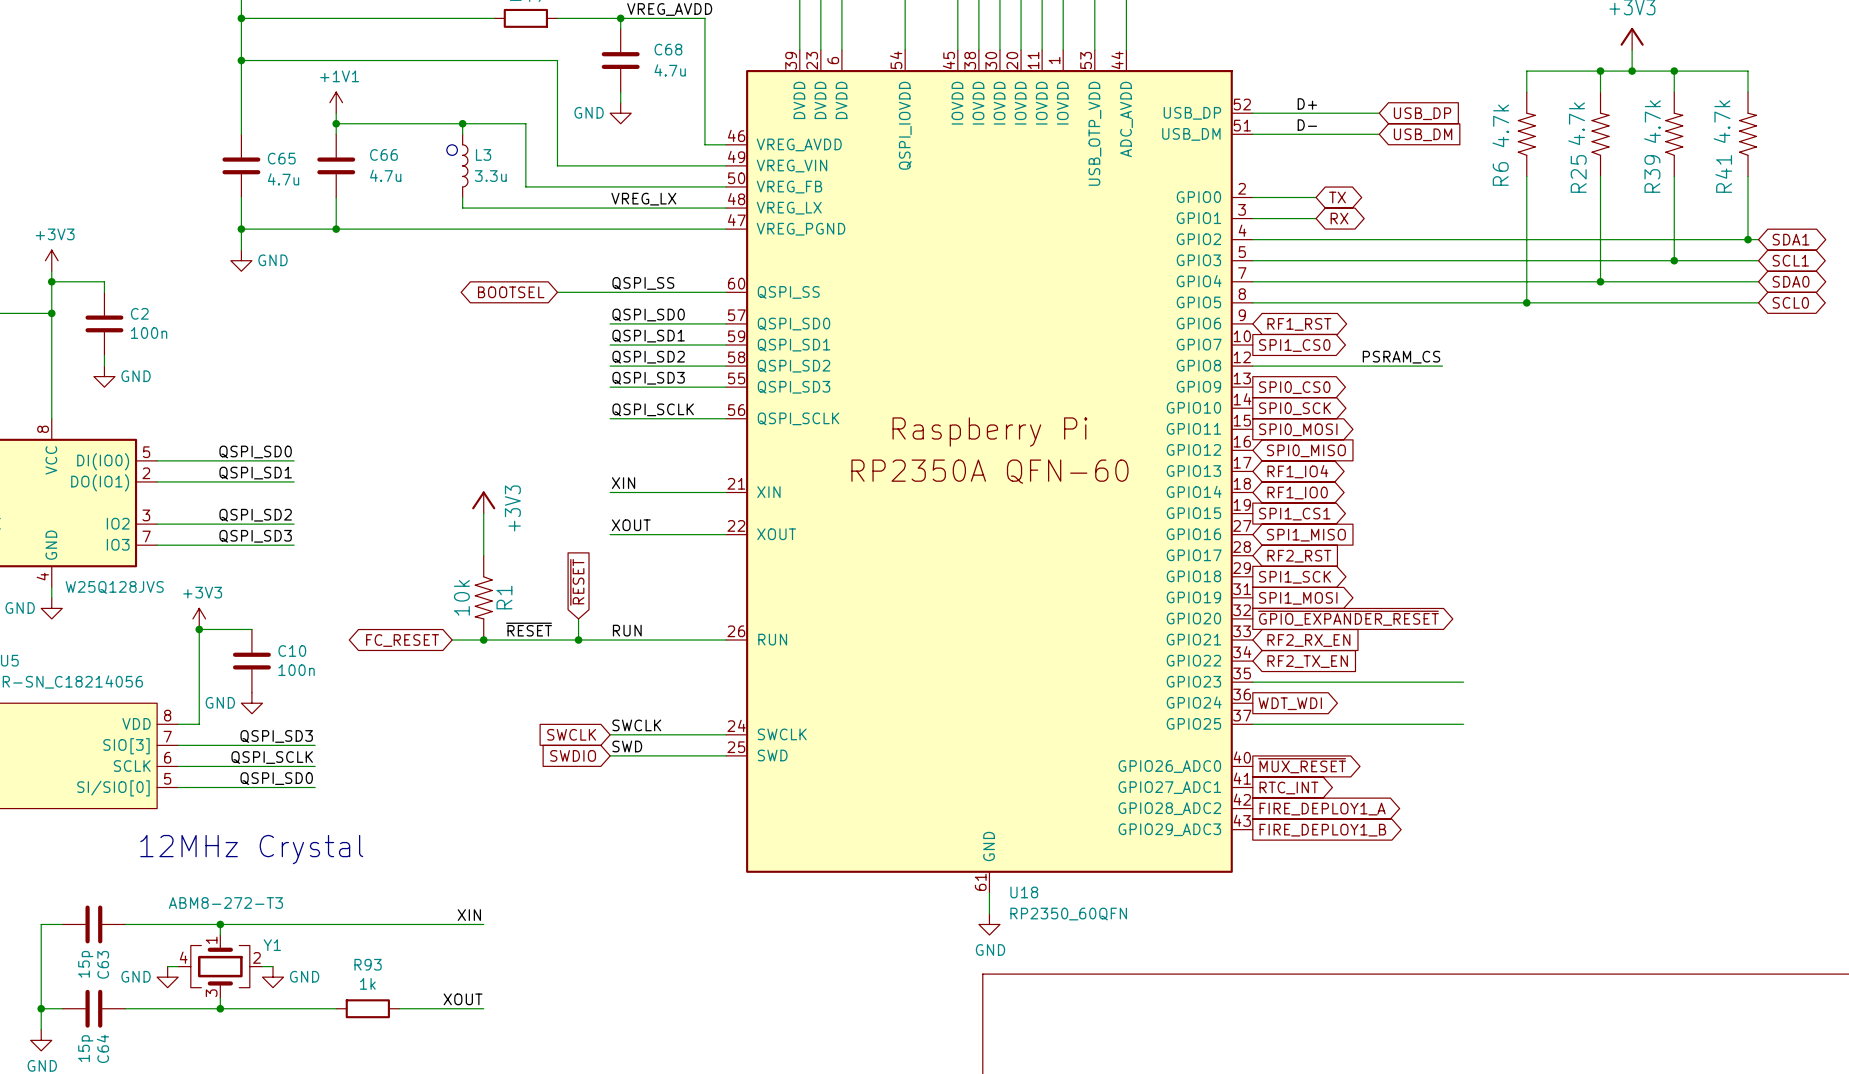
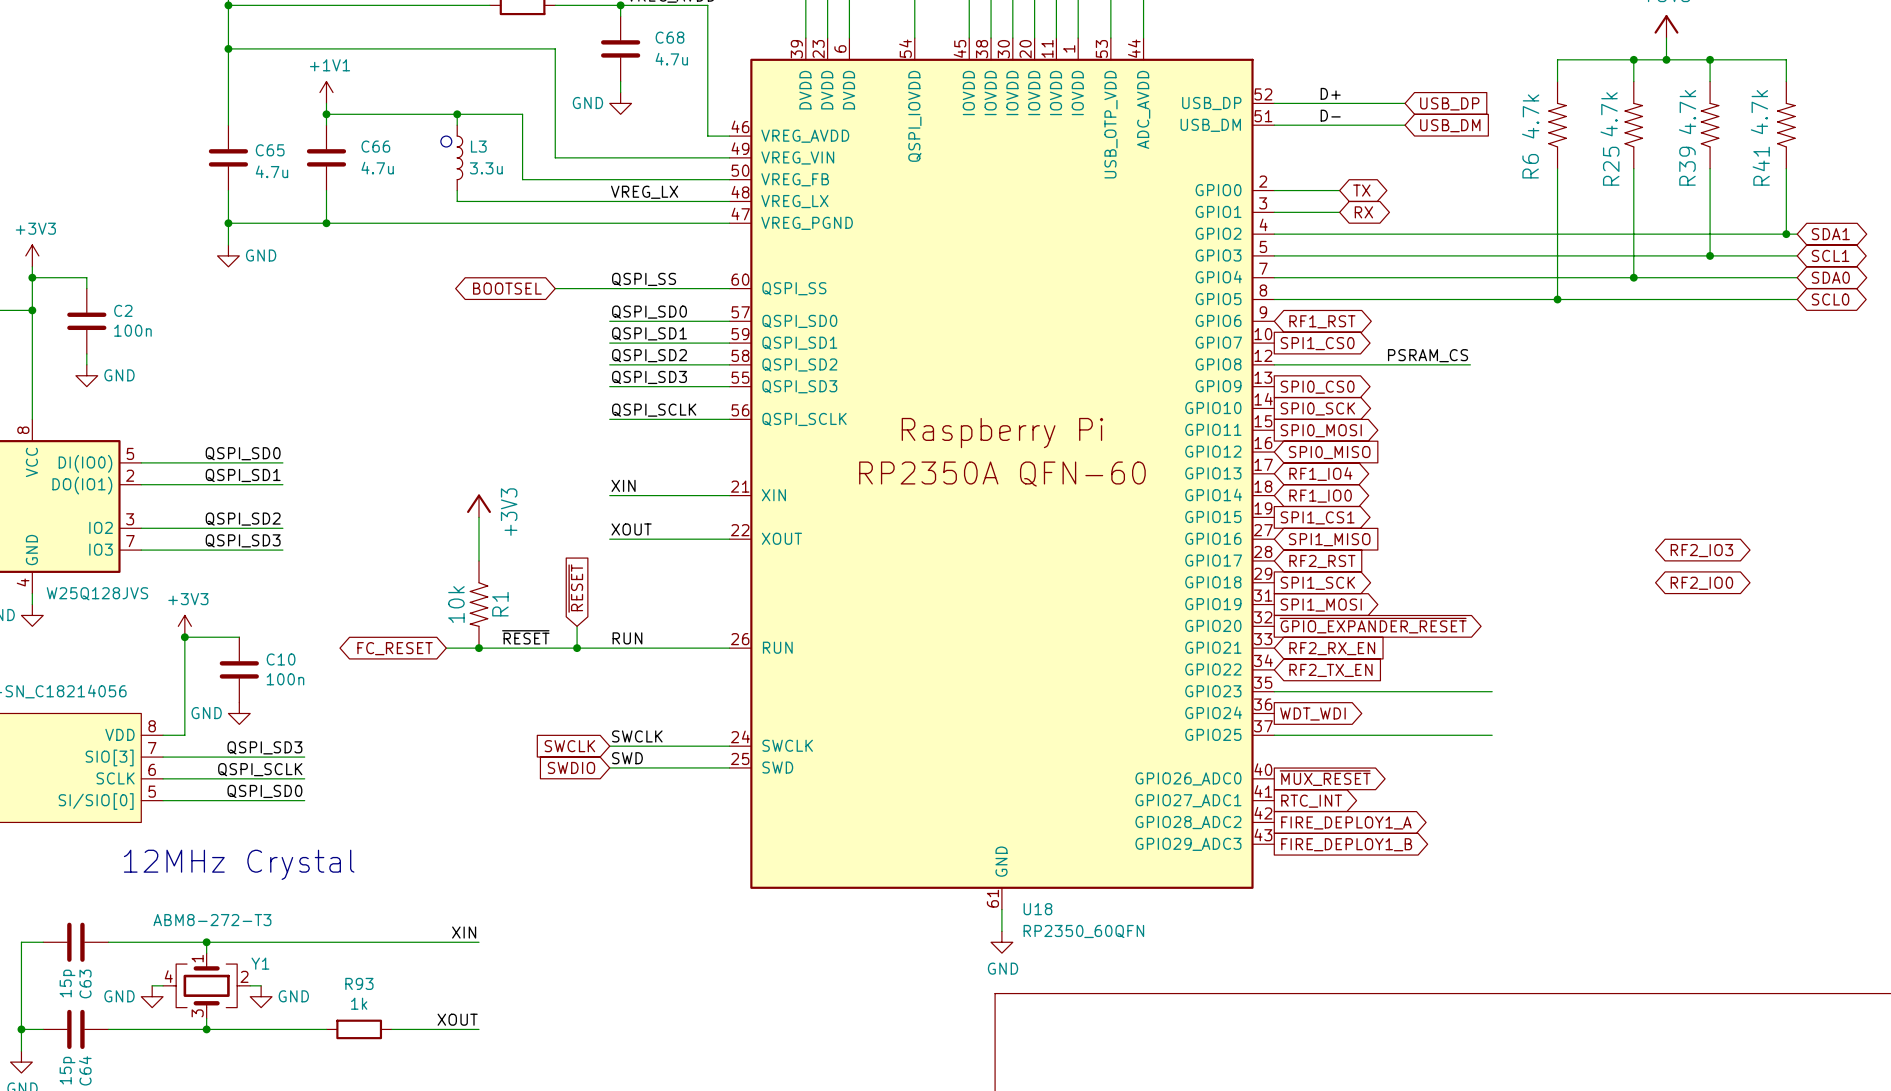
global label: none -> RF2_IO3 (1701, 550)
global label: none -> RF2_IO0 (1701, 583)

